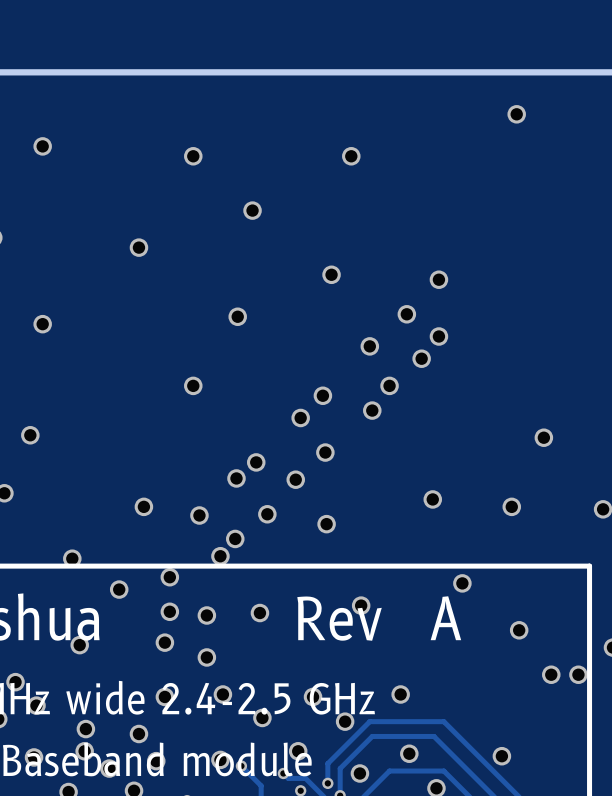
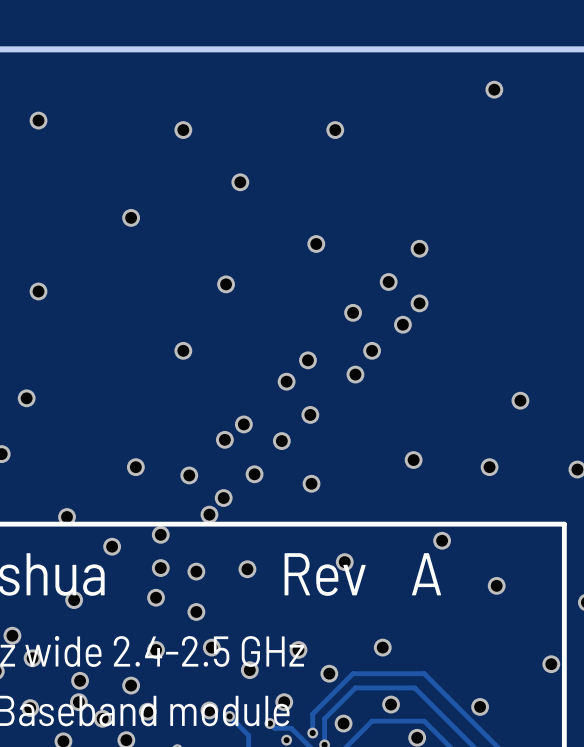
via: (551, 674) -> none
via: (578, 674) -> none
via: none -> (551, 664)

